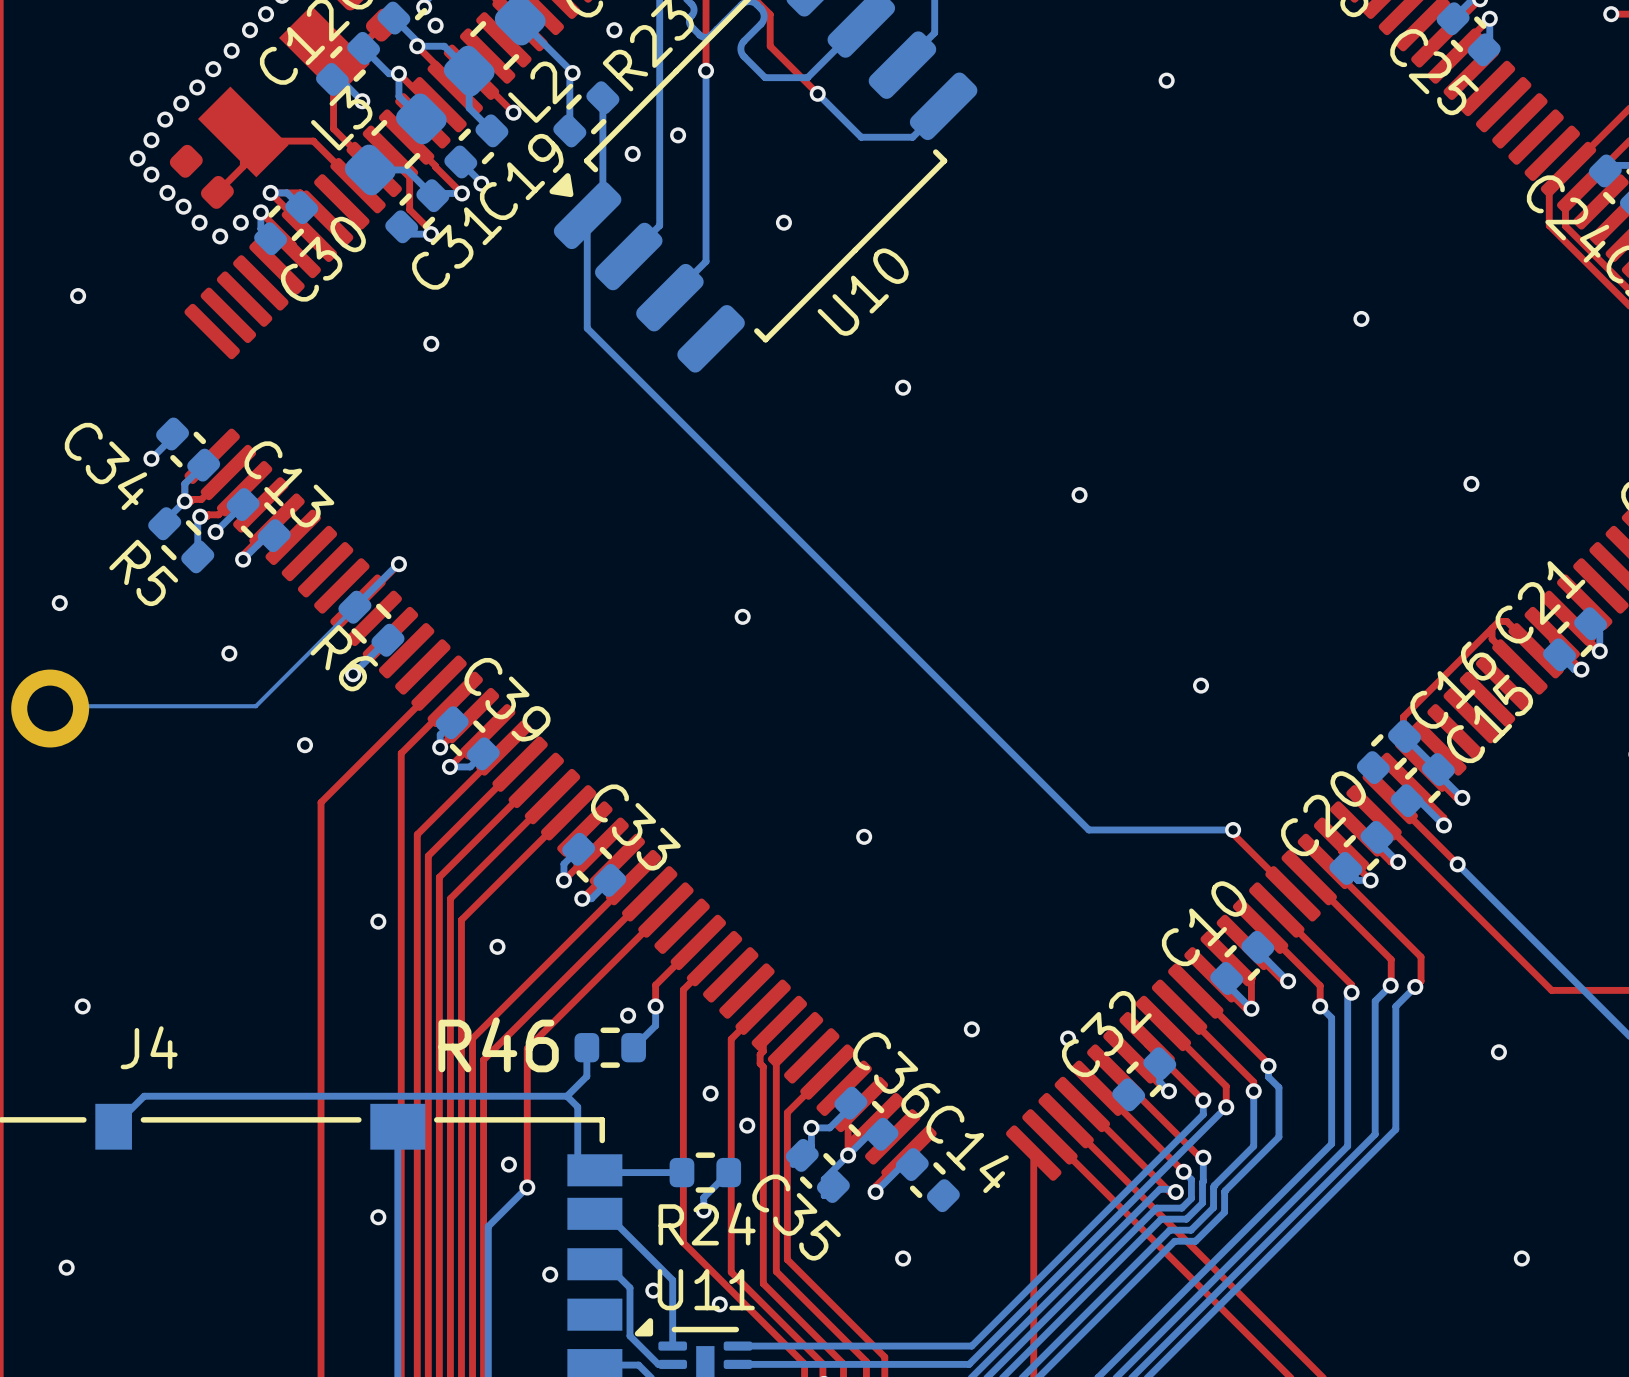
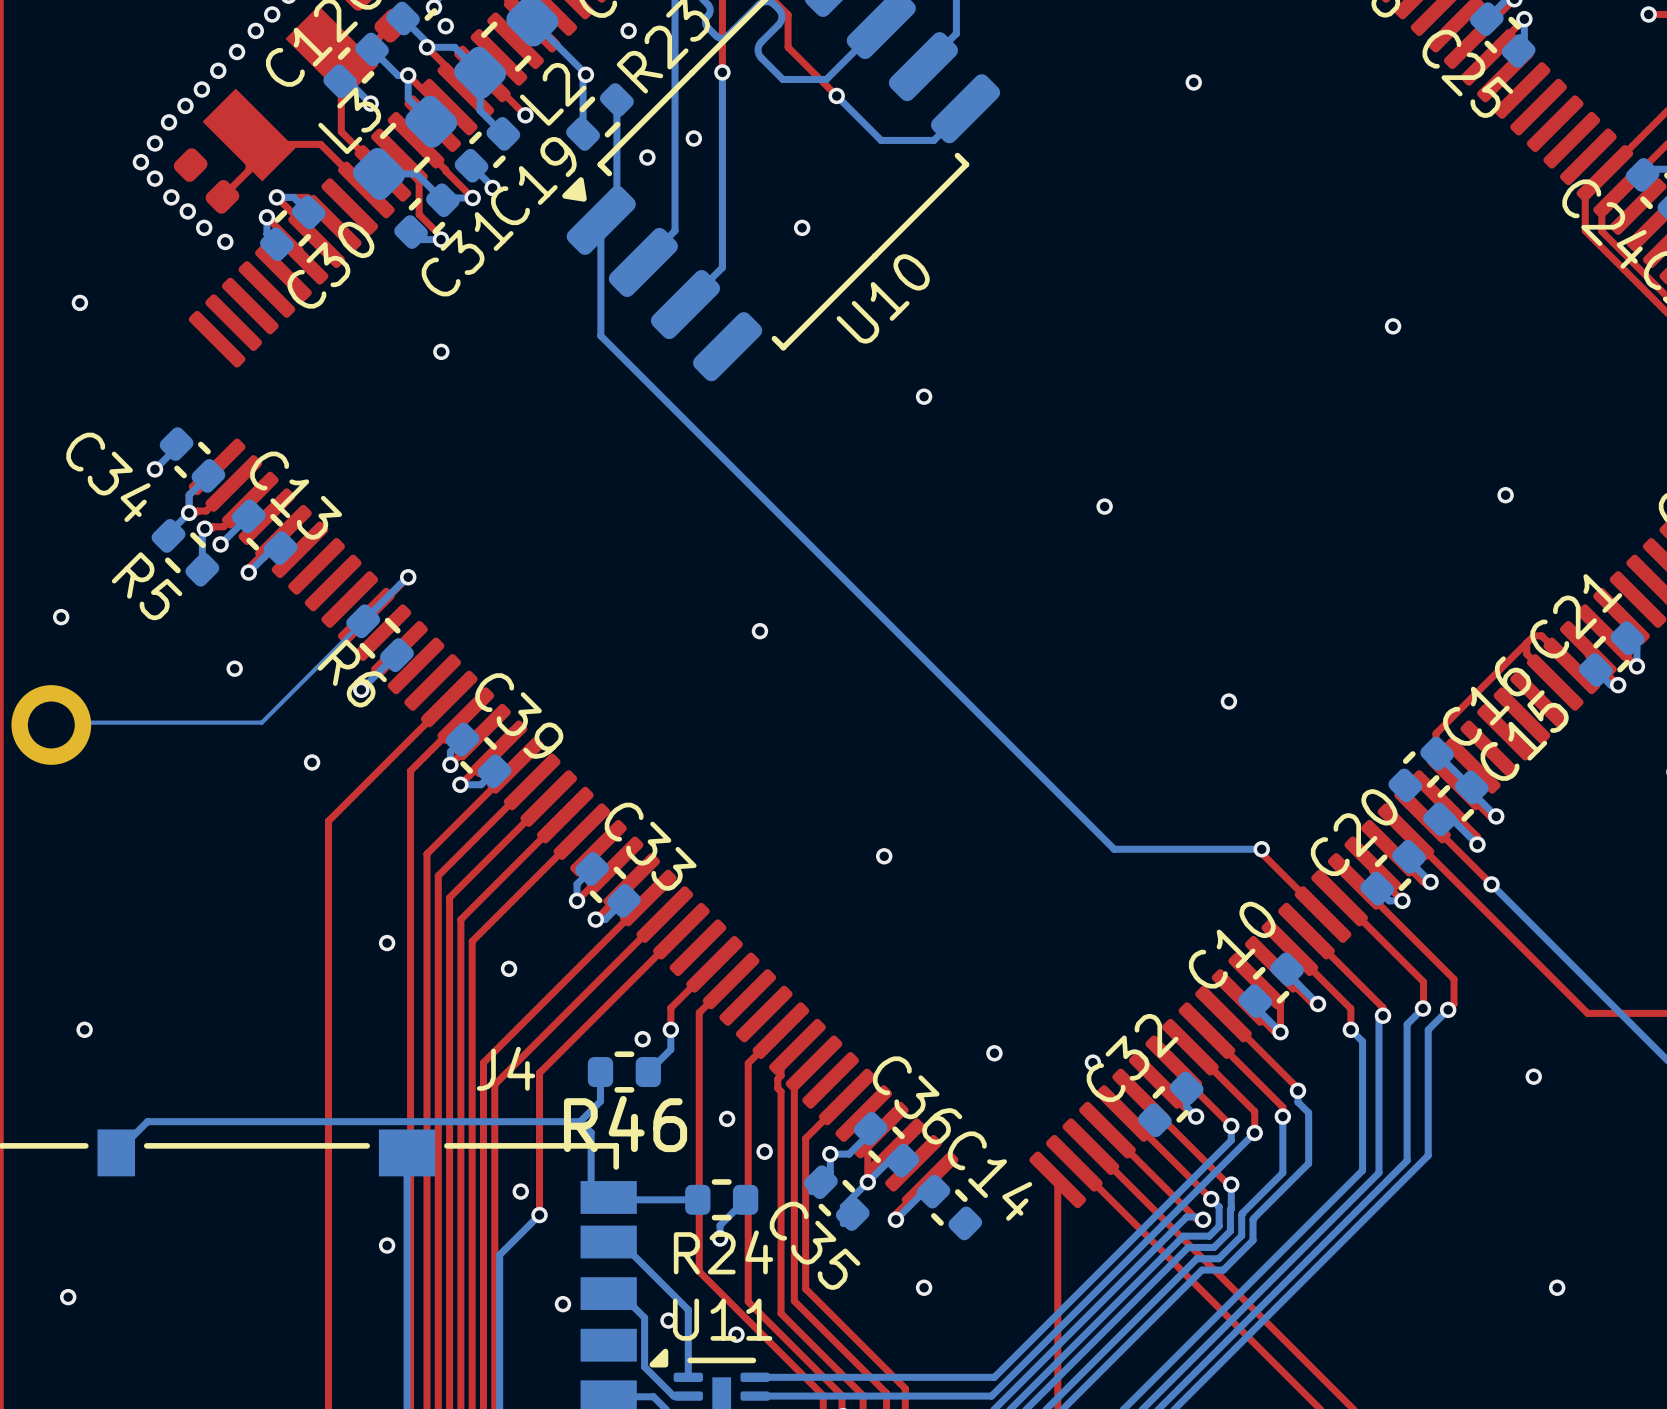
via: (240, 222) -> none
R46 name position: R46 (498, 1044) -> R46 (625, 1124)
J4 name position: J4 (149, 1047) -> J4 (505, 1068)

